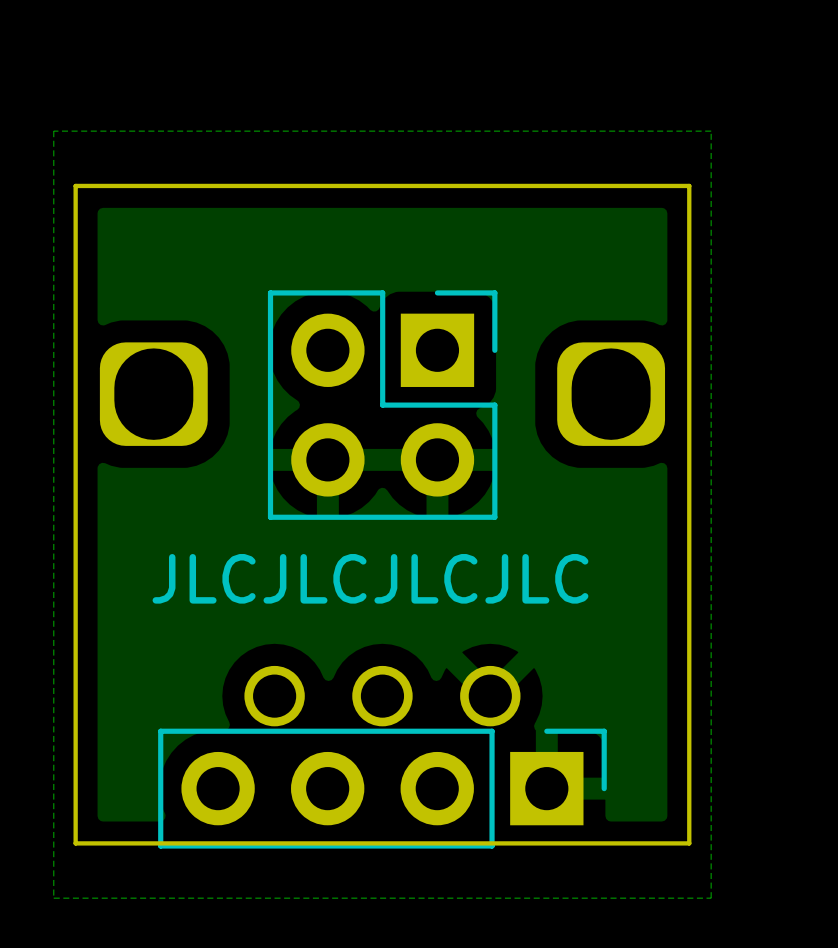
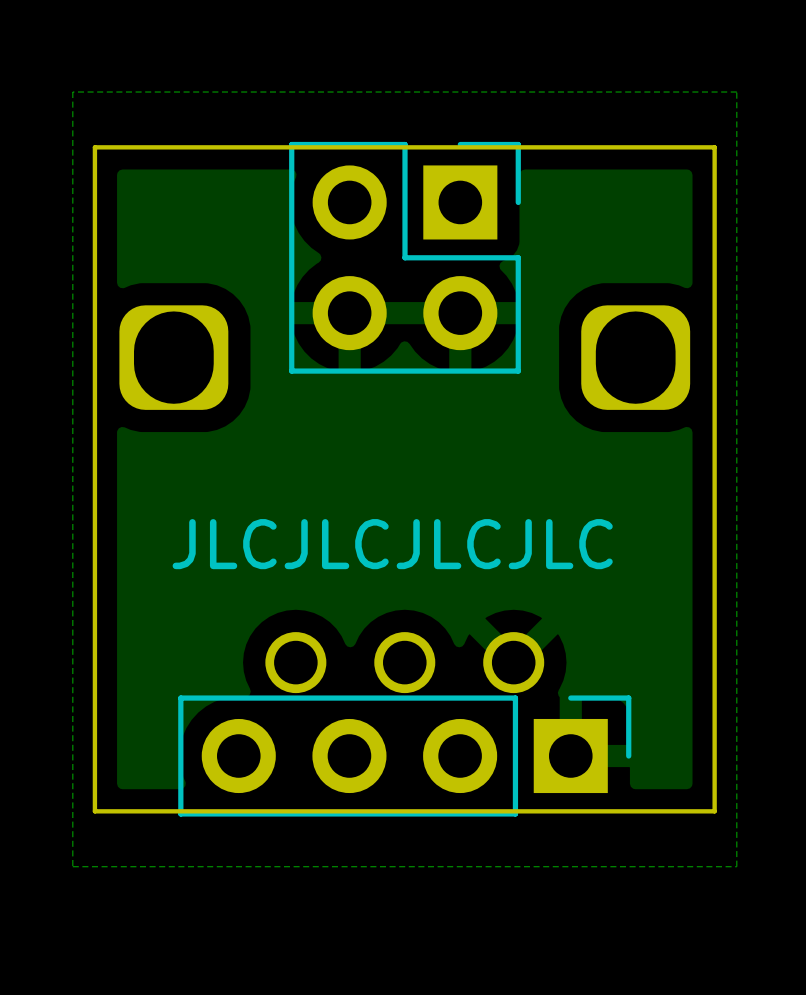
part position: (382, 405) -> (405, 257)

